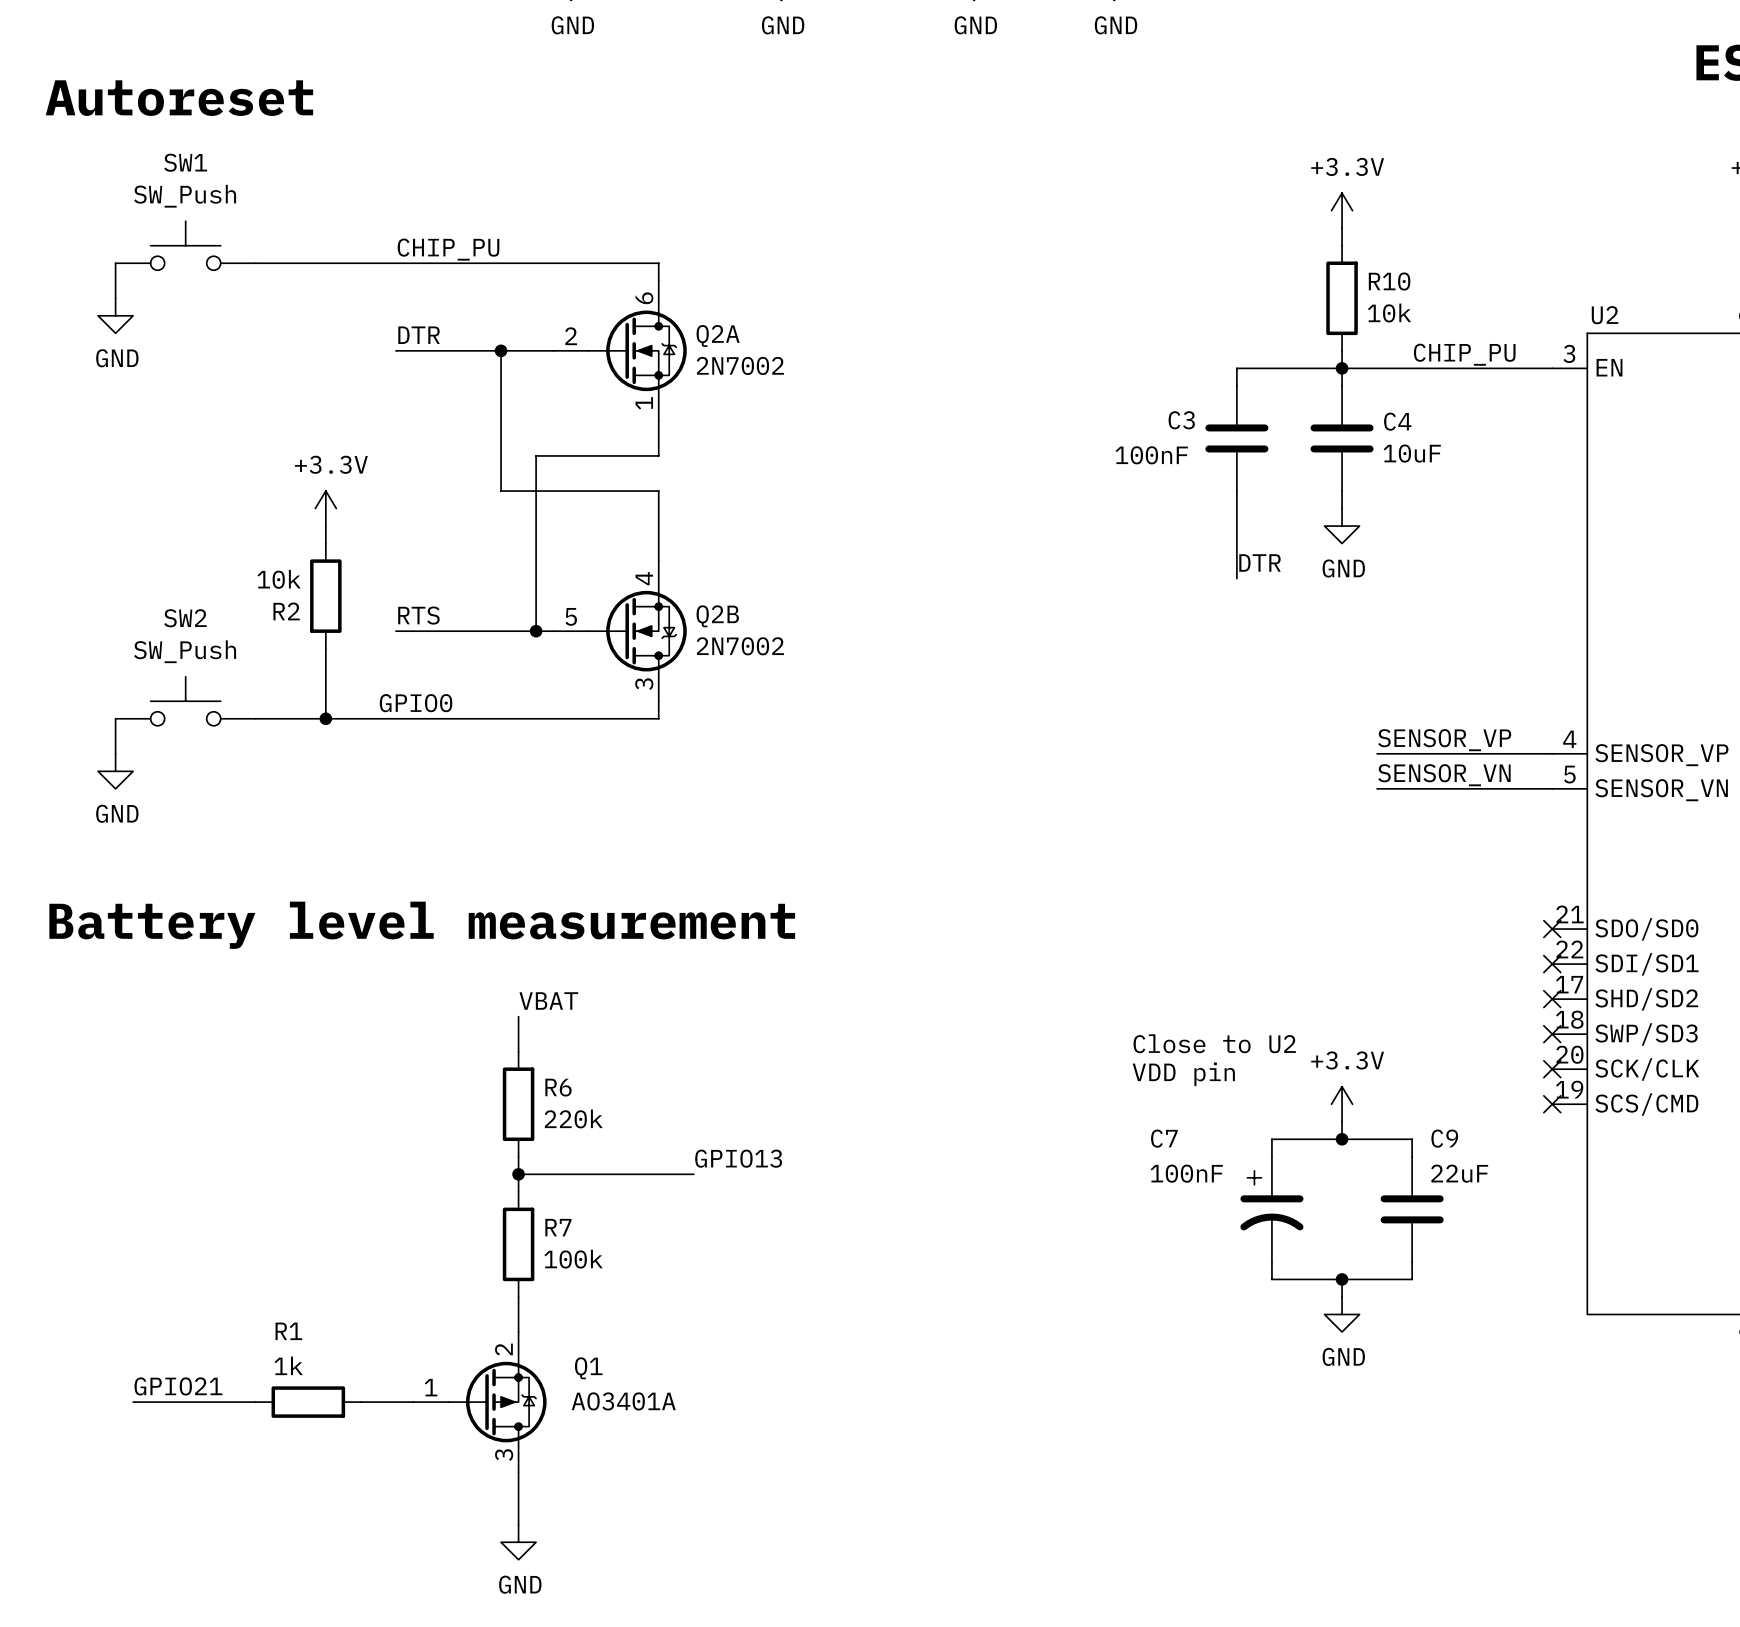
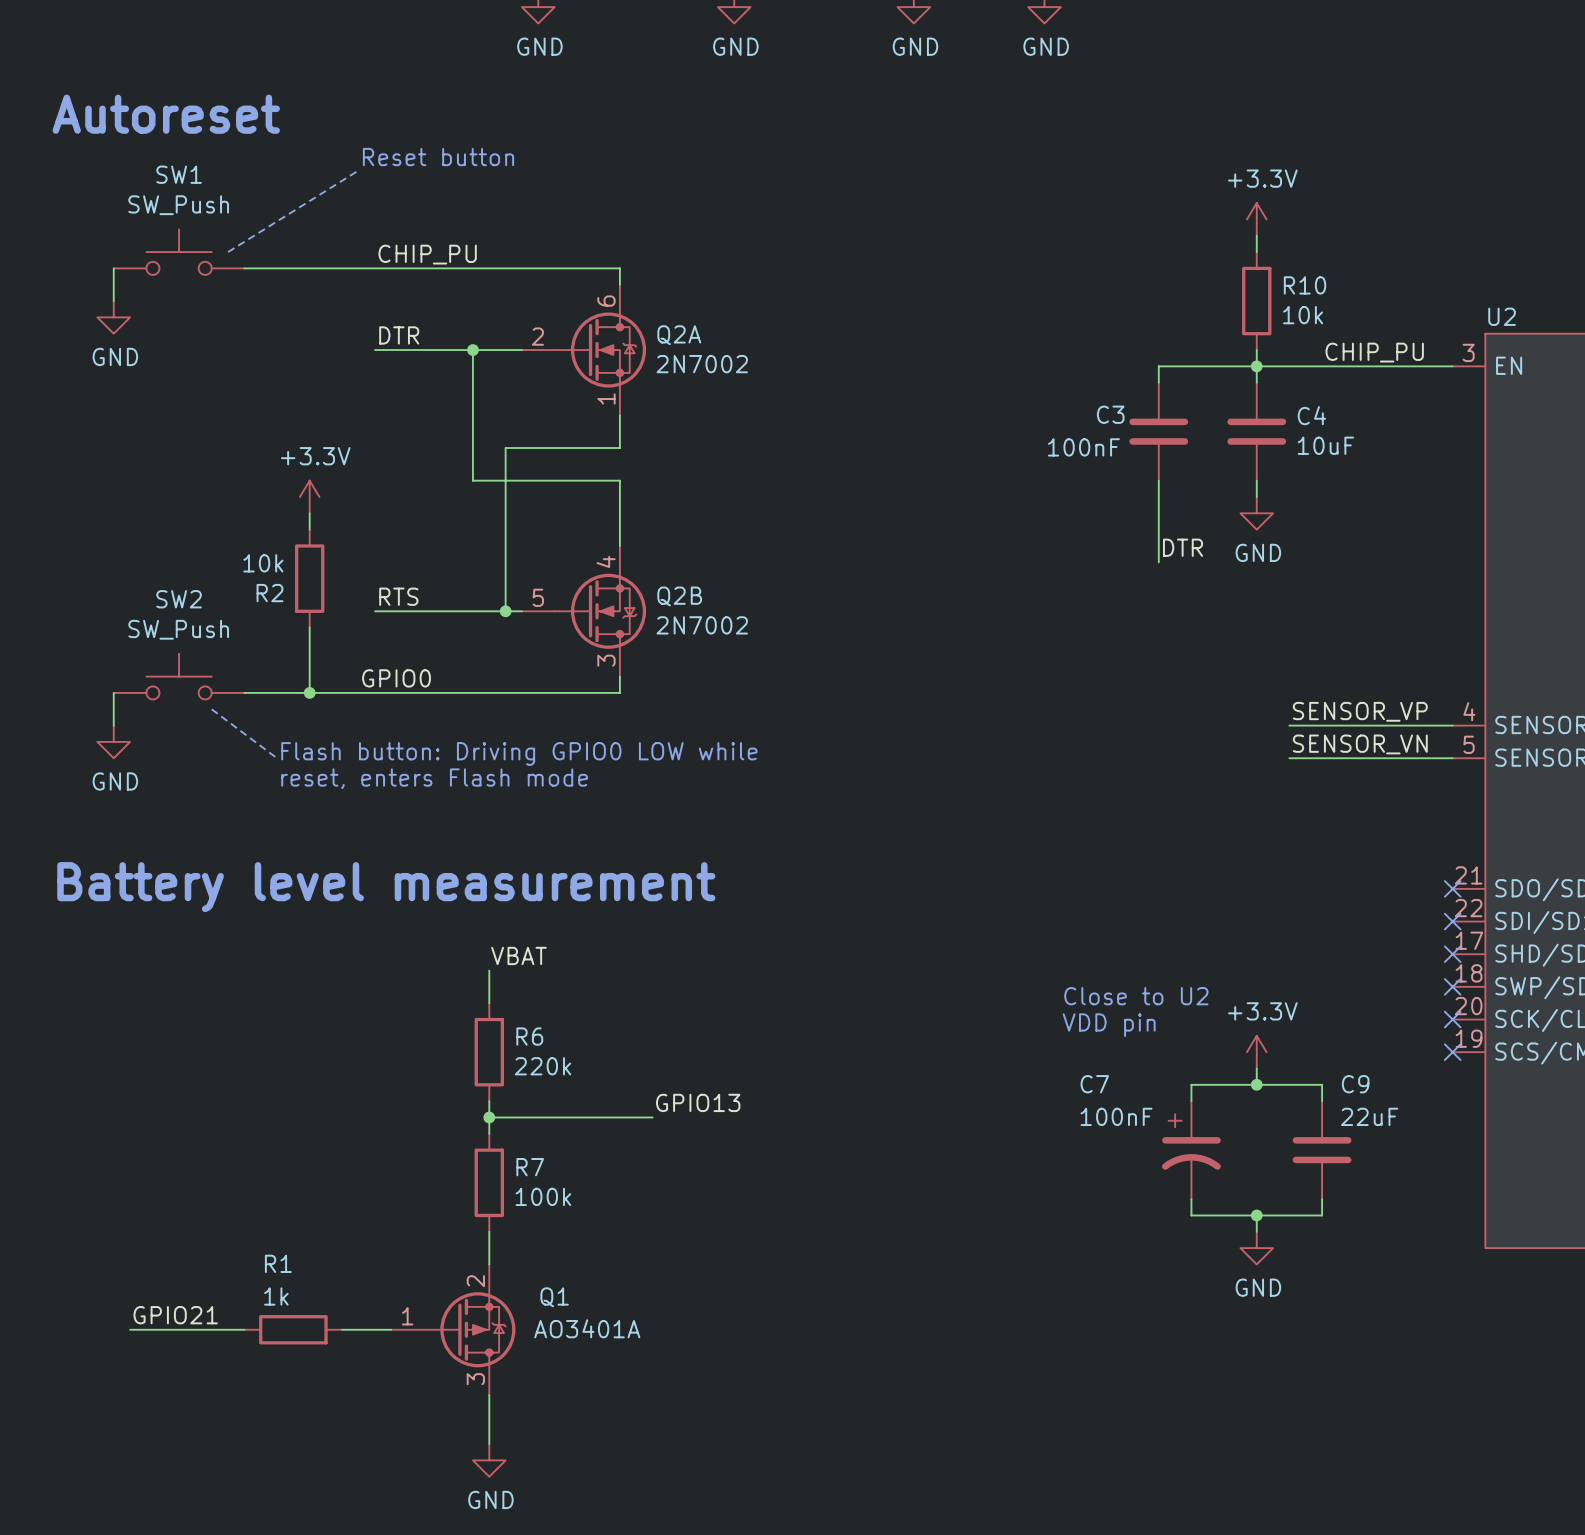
text: none -> Reset button (438, 157)
line: none -> (358, 170) (228, 252)
line: none -> (211, 709) (277, 758)
text: none -> Flash button: Driving GPIO0 LOW while (519, 753)
text: none -> reset, enters Flash mode (434, 778)

